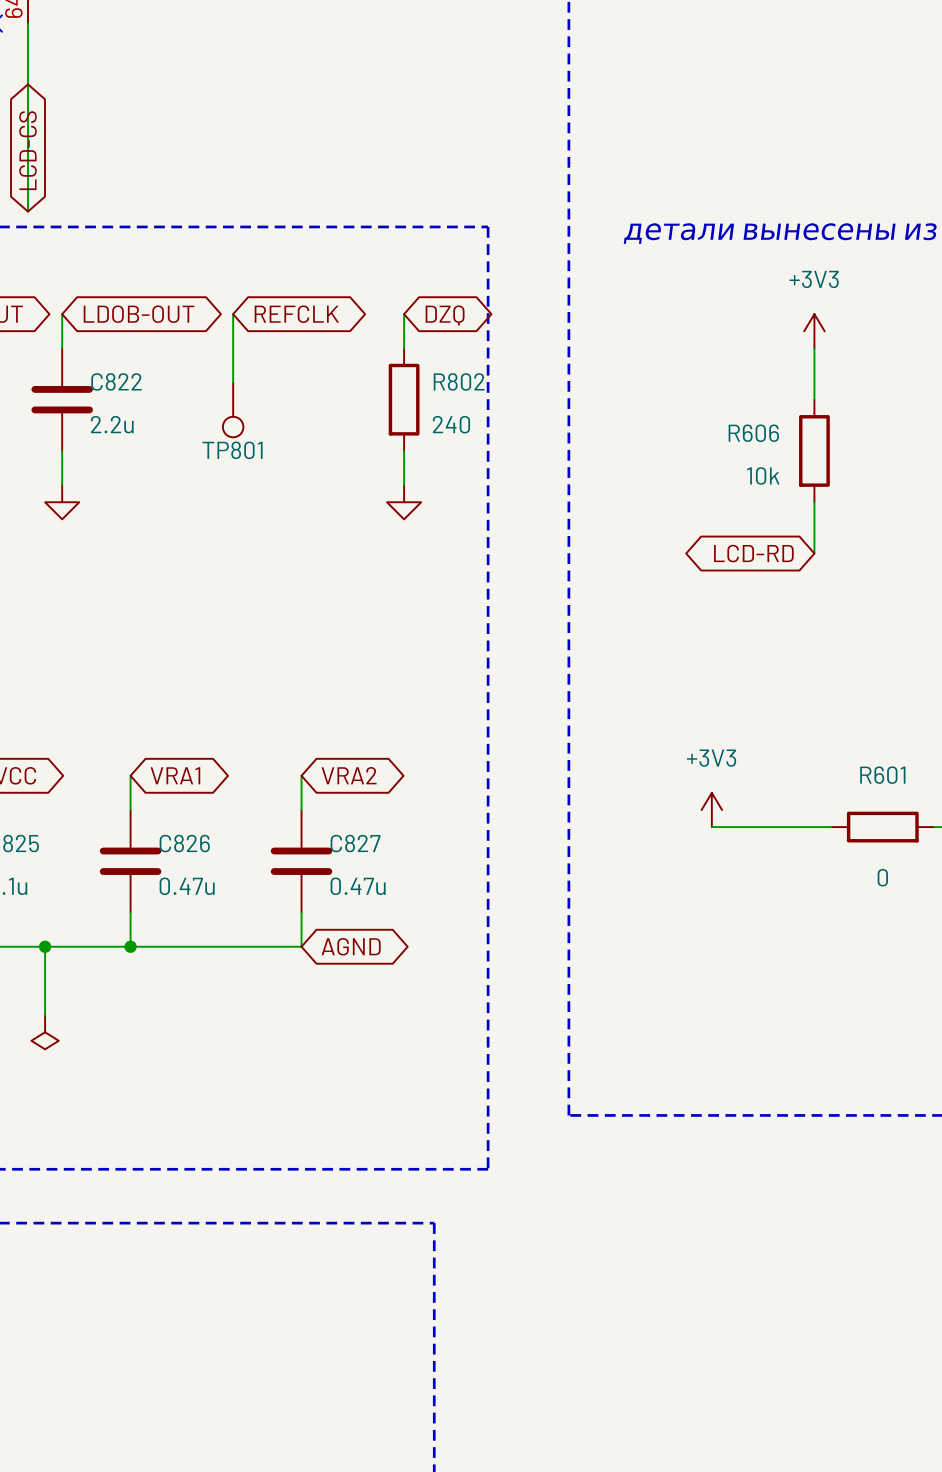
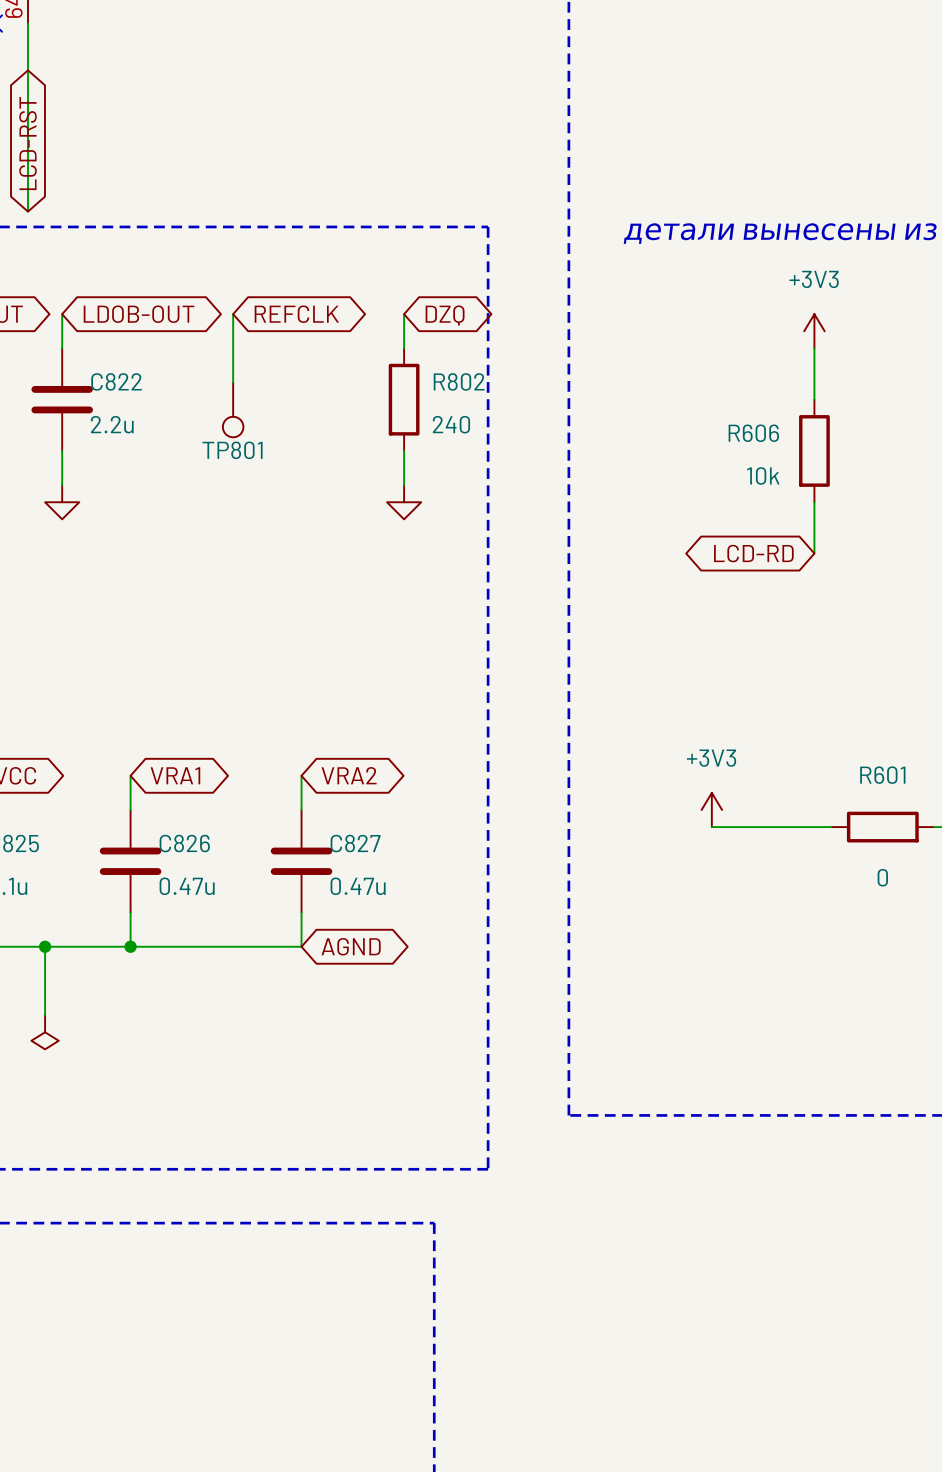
global label: LCD-CS (28, 150) -> LCD-RST (28, 143)

